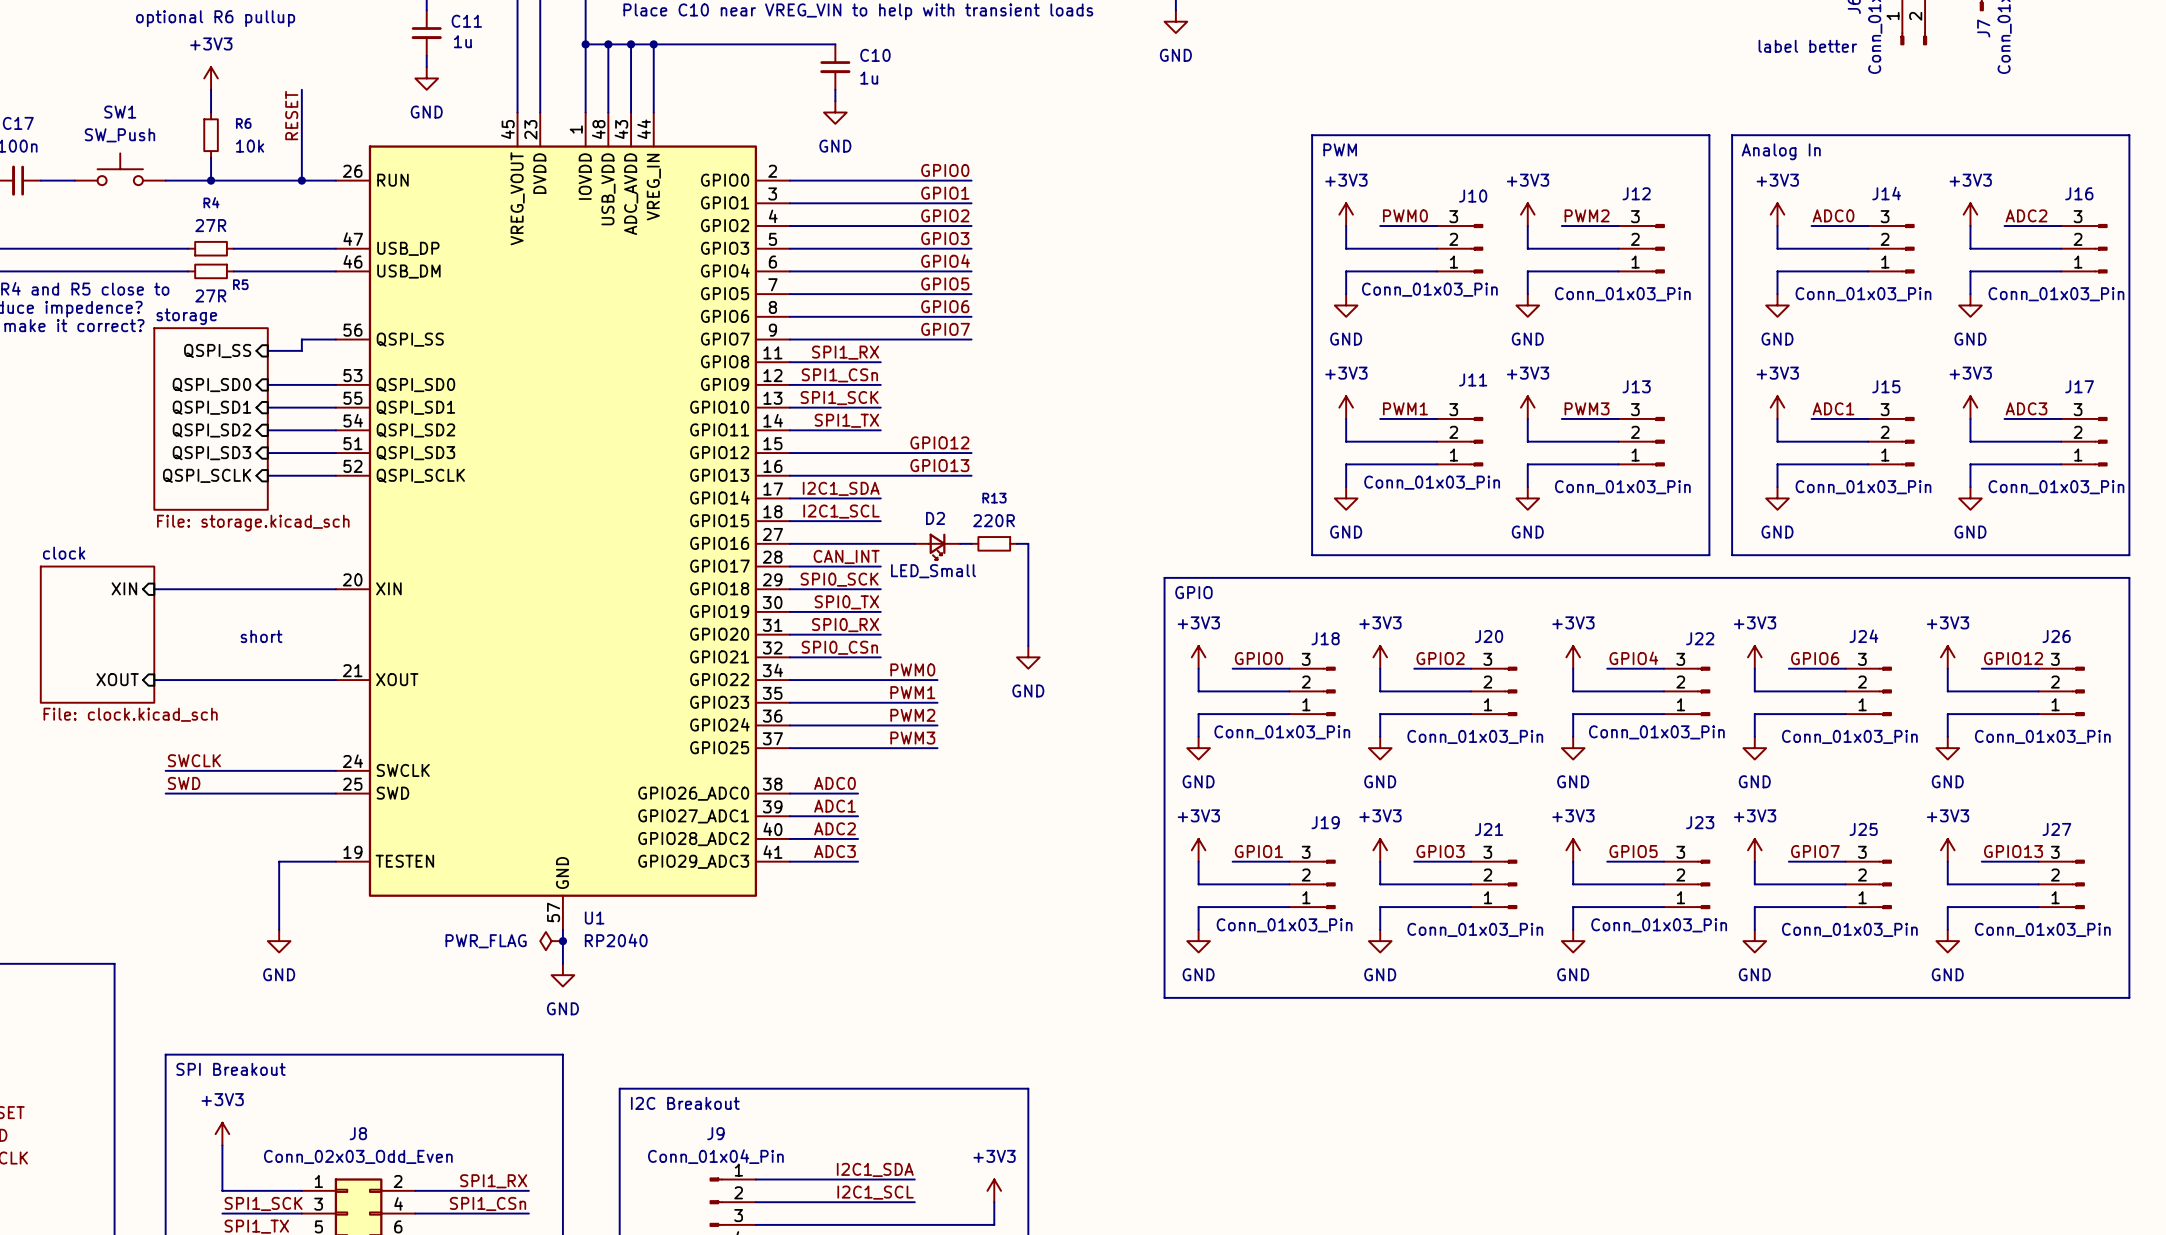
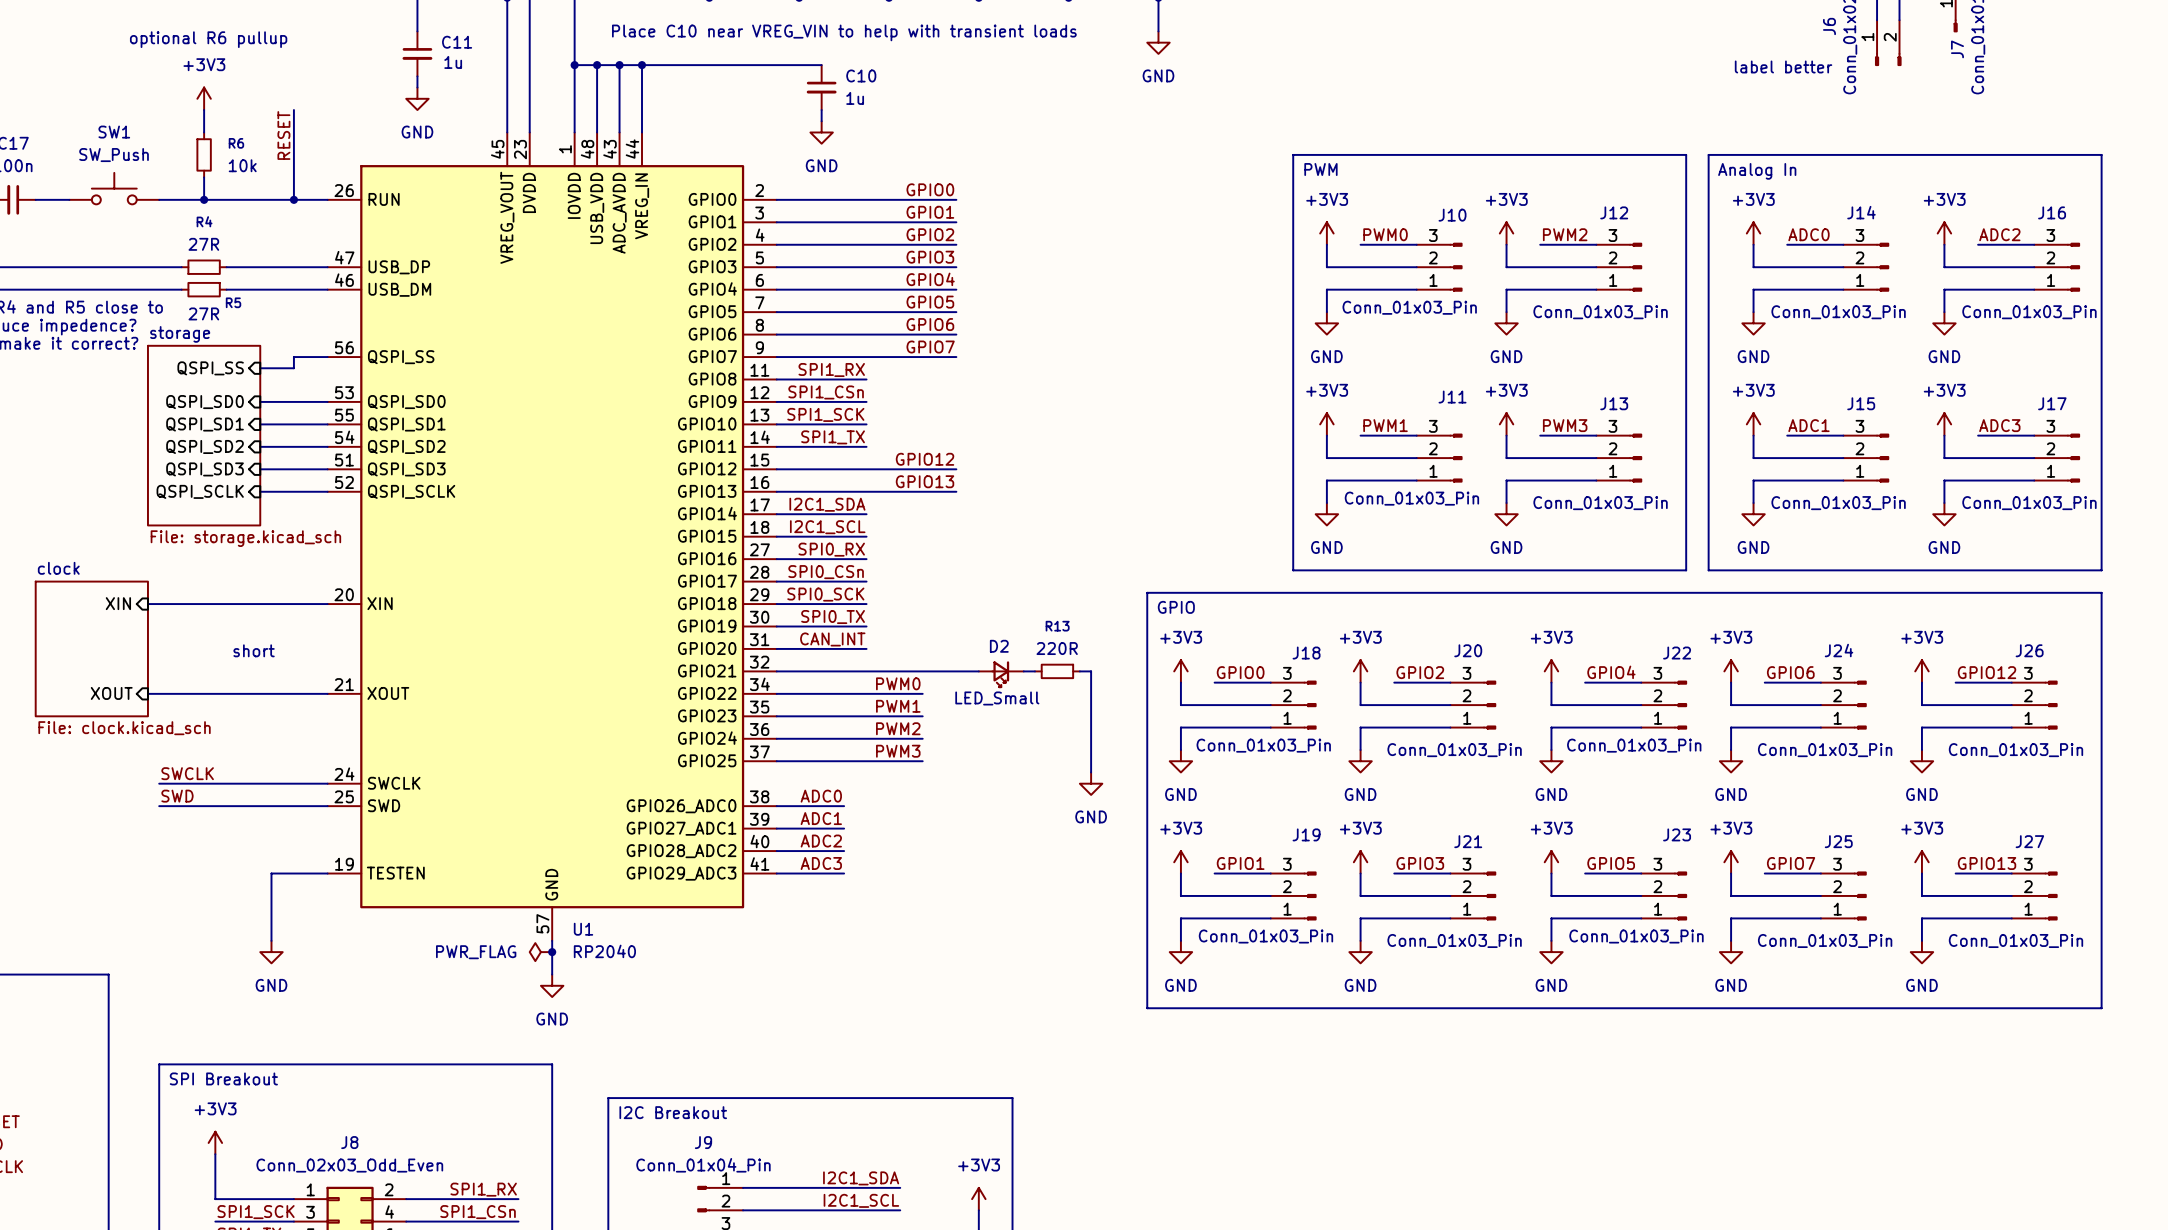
label: none -> SPI0_RX (831, 549)
wire: (880, 543) (914, 543) -> none
wire: (960, 543) (971, 543) -> (1023, 671) (1034, 671)
R13 position: (994, 543) -> (1057, 671)
wire: (1016, 543) (1028, 543) (1028, 646) -> (1079, 671) (1091, 671) (1091, 772)
D2 position: (937, 546) -> (1001, 674)
label: CAN_INT (846, 556) -> SPI0_CSn (826, 572)
label: SPI0_RX (845, 625) -> CAN_INT (832, 639)
label: SPI0_CSn (839, 647) -> none
wire: none -> (866, 671) (978, 671)
power symbol position: GND (1028, 657) -> GND (1091, 783)

